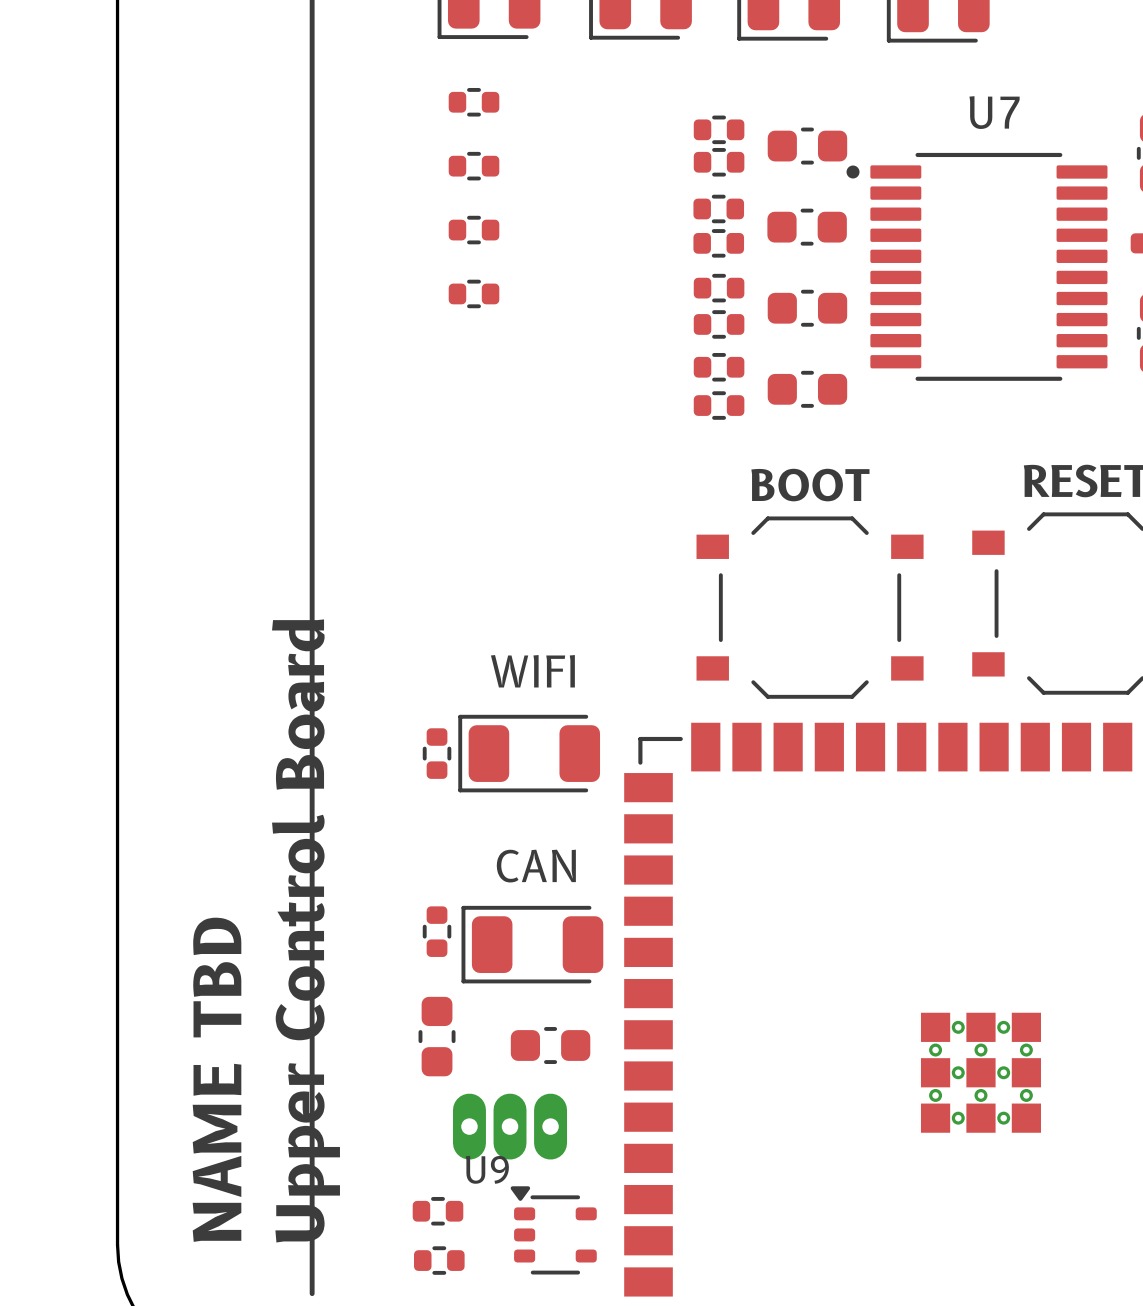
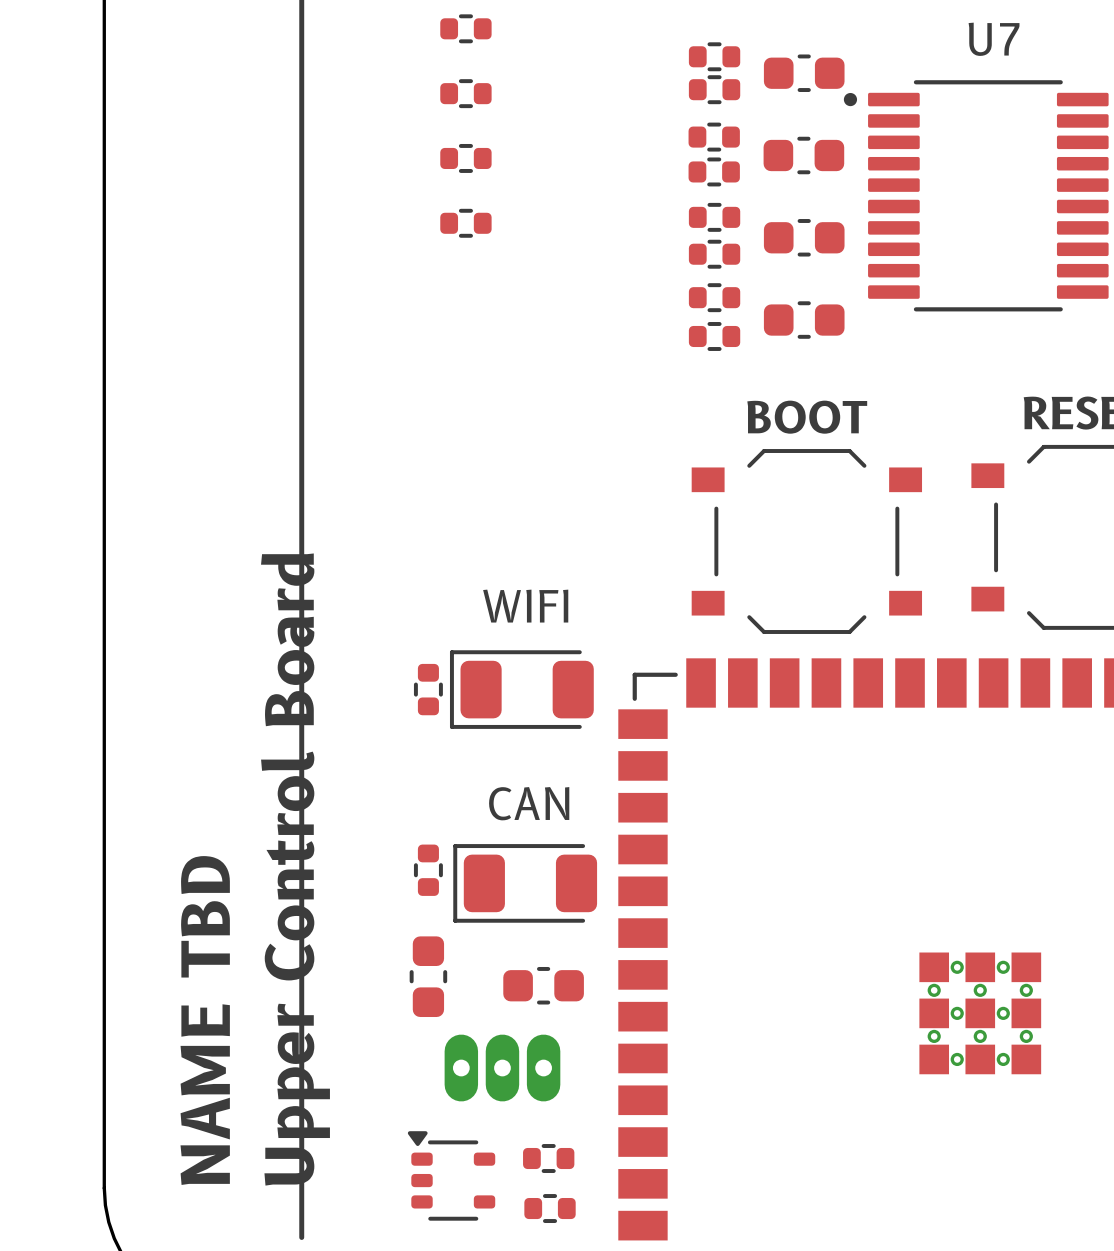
part: (438, 1211) -> none
part: none -> (548, 1158)
U9: (553, 1230) -> none
part: none -> (451, 1175)
part: (439, 1260) -> none
part: none -> (550, 1208)

